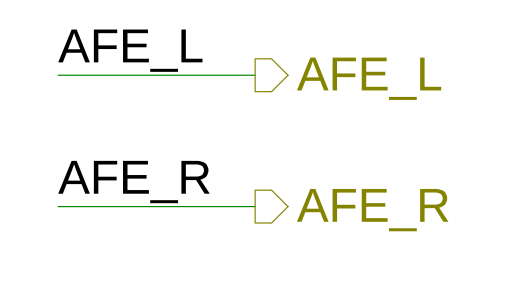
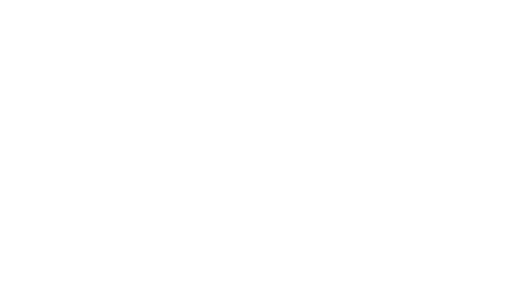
label: AFE_L (130, 50) -> none
wire: (58, 75) (255, 75) -> none
hierarchical label: AFE_L (369, 78) -> none
label: AFE_R (133, 182) -> none
wire: (58, 206) (255, 206) -> none
hierarchical label: AFE_R (372, 210) -> none

